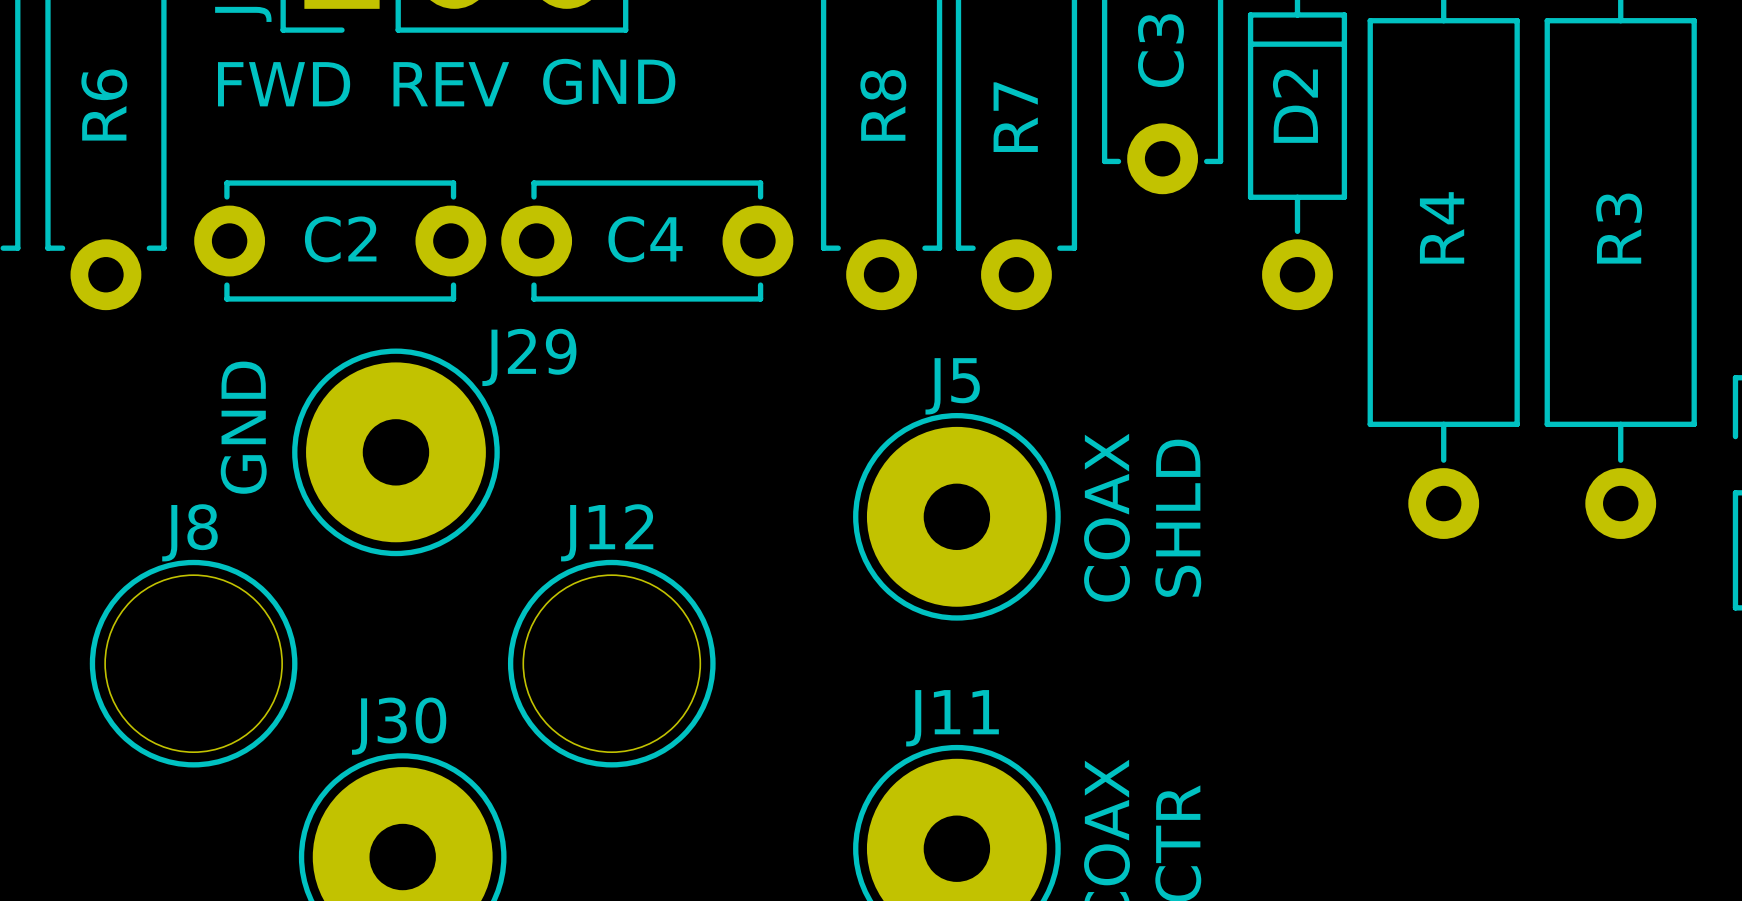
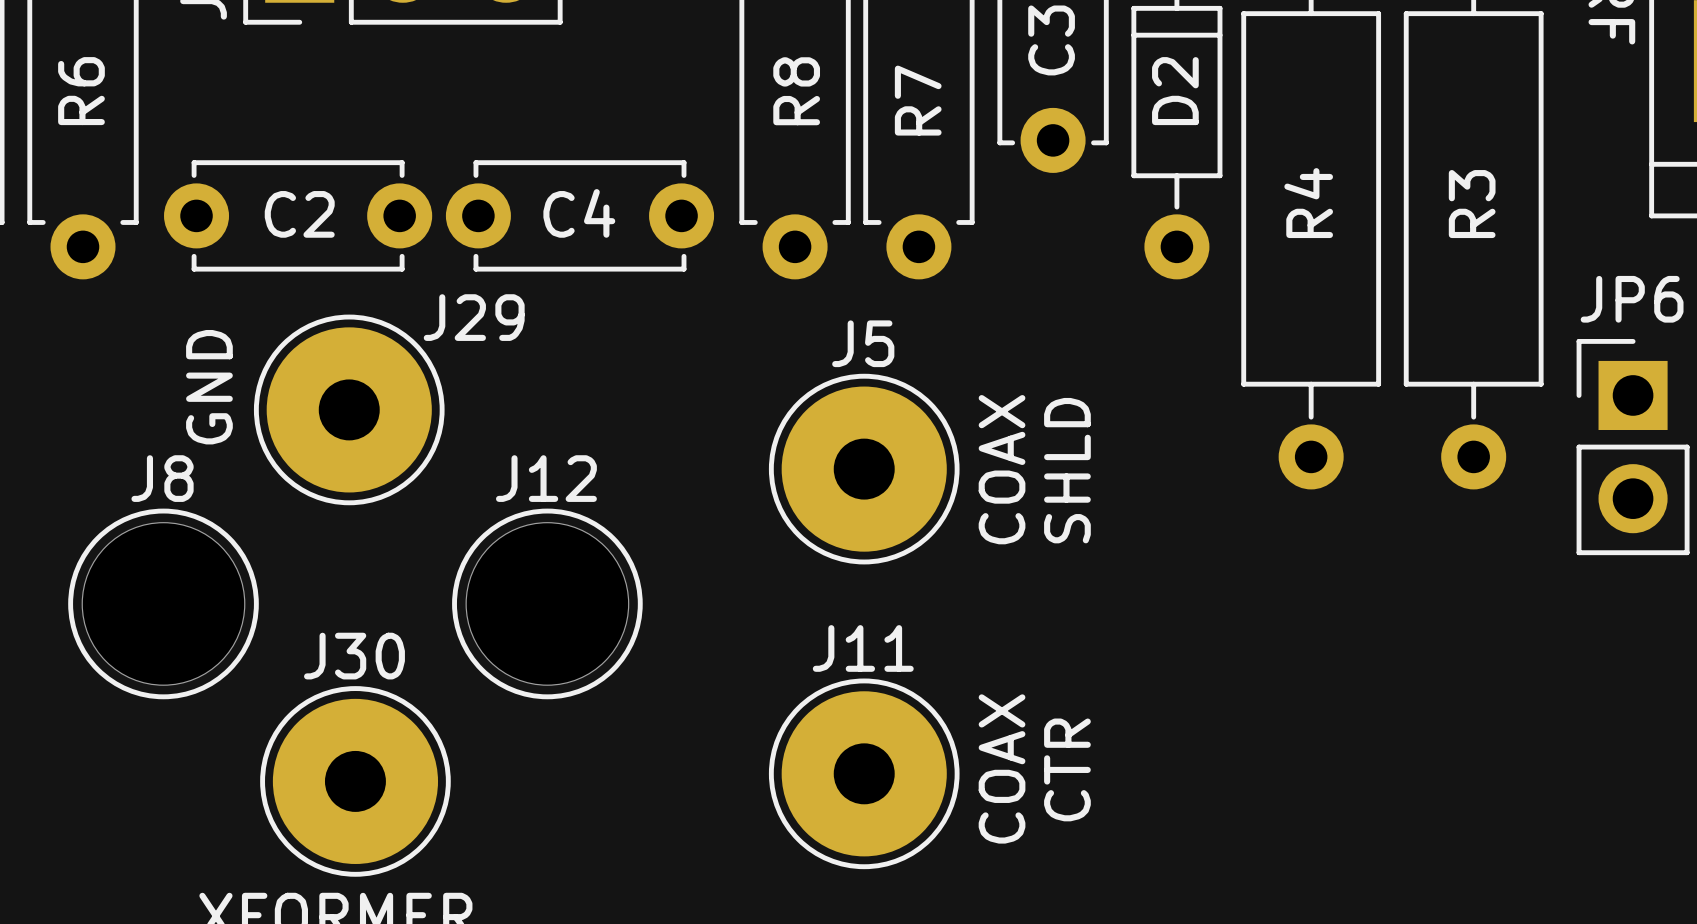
text: GND (609, 81) -> none
text: FWD (284, 84) -> none
text: REV (451, 84) -> none

